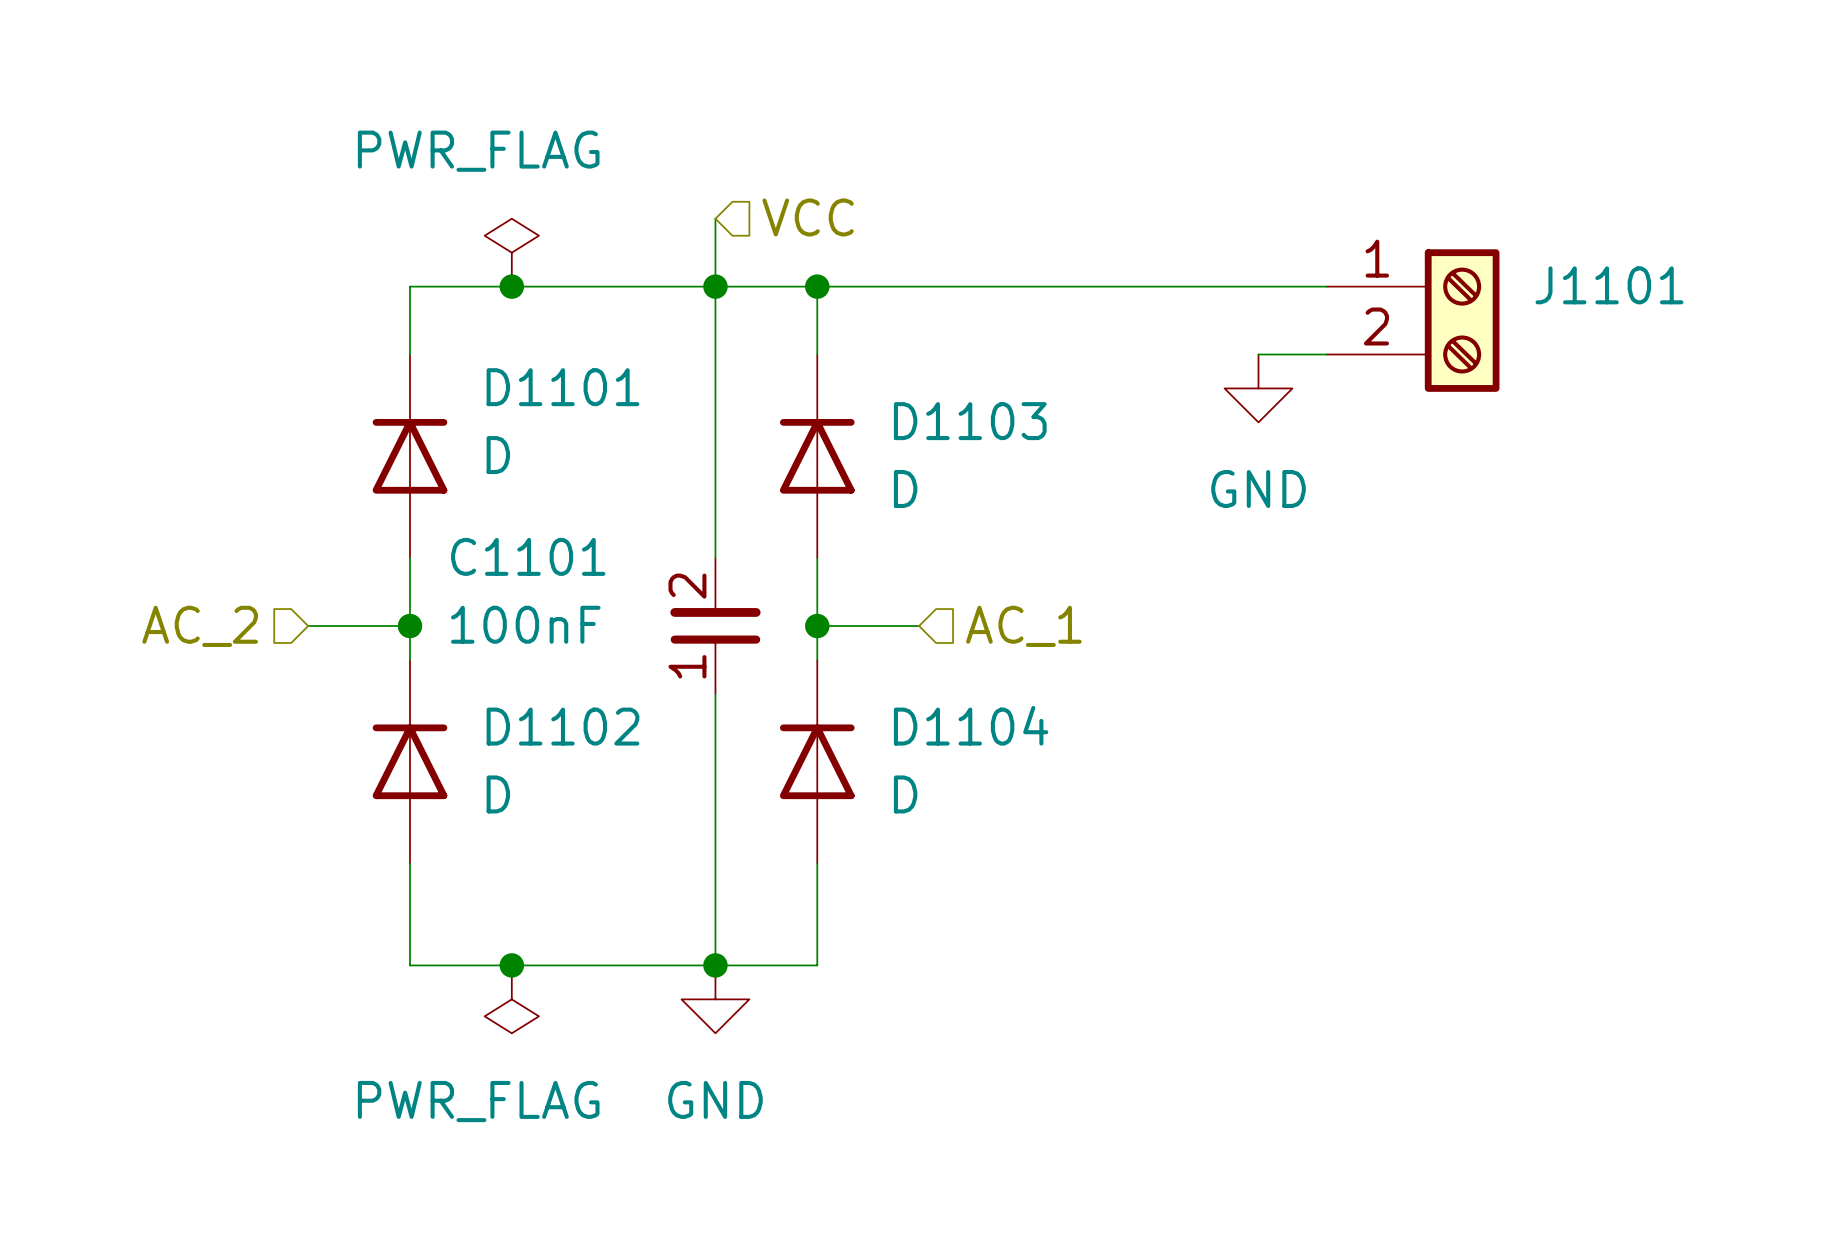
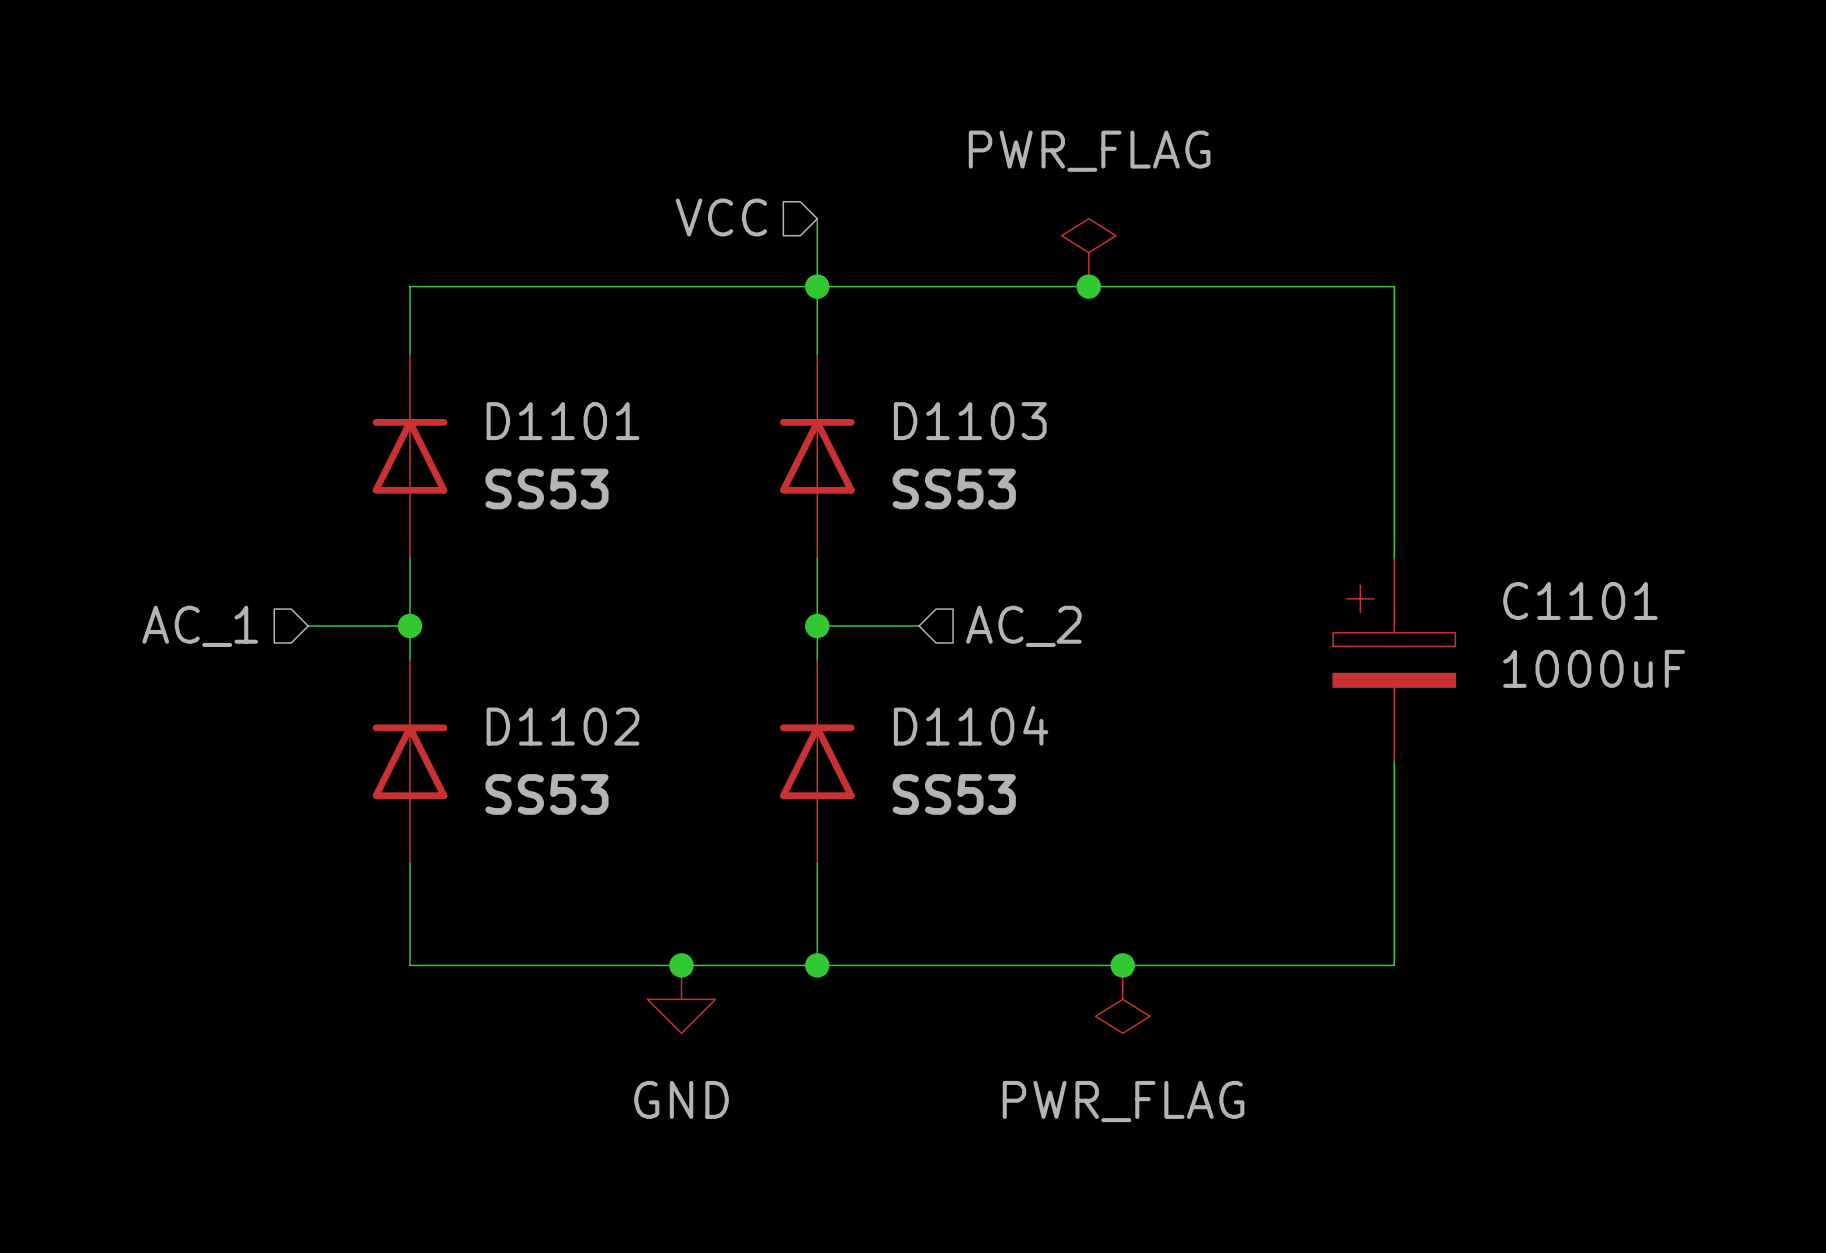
hierarchical label rotation: 0° (808, 217) -> 180° (721, 217)
wire: (715, 218) (715, 558) -> none
wire: none -> (817, 218) (817, 286)
power symbol: PWR_FLAG (511, 252) -> none
power symbol: none -> PWR_FLAG (1088, 252)
junction: (511, 286) -> none
junction: (715, 286) -> none
junction: none -> (1088, 286)
wire: none -> (1326, 286) (1394, 286) (1394, 558)
J1101: (1412, 320) -> none
wire: (1258, 354) (1326, 354) -> none
D1101 name position: D1101 (562, 387) -> D1101 (562, 421)
power symbol: GND (1258, 388) -> none
D1101 value: D (498, 455) -> SS53 (546, 488)
D1103 value: D (905, 488) -> SS53 (954, 488)
C1101 name position: C1101 (528, 556) -> C1101 (1580, 600)
C1101 symbol: [670, 558, 761, 694] -> [1333, 558, 1456, 762]
C1101 value: 100nF (525, 624) -> 1000uF (1594, 668)
hierarchical label: AC_2 (200, 626) -> AC_1 (200, 626)
hierarchical label: AC_1 (1023, 626) -> AC_2 (1023, 626)
wire: (715, 693) (715, 965) -> none
wire: none -> (1394, 761) (1394, 965) (817, 965)
D1102 value: D (498, 794) -> SS53 (546, 794)
D1104 value: D (905, 794) -> SS53 (954, 794)
junction: (511, 965) -> none
junction position: (715, 965) -> (681, 965)
junction: none -> (817, 965)
junction: none -> (1122, 965)
power symbol: PWR_FLAG (511, 999) -> none
power symbol position: GND (715, 999) -> GND (681, 999)
power symbol: none -> PWR_FLAG (1122, 999)

